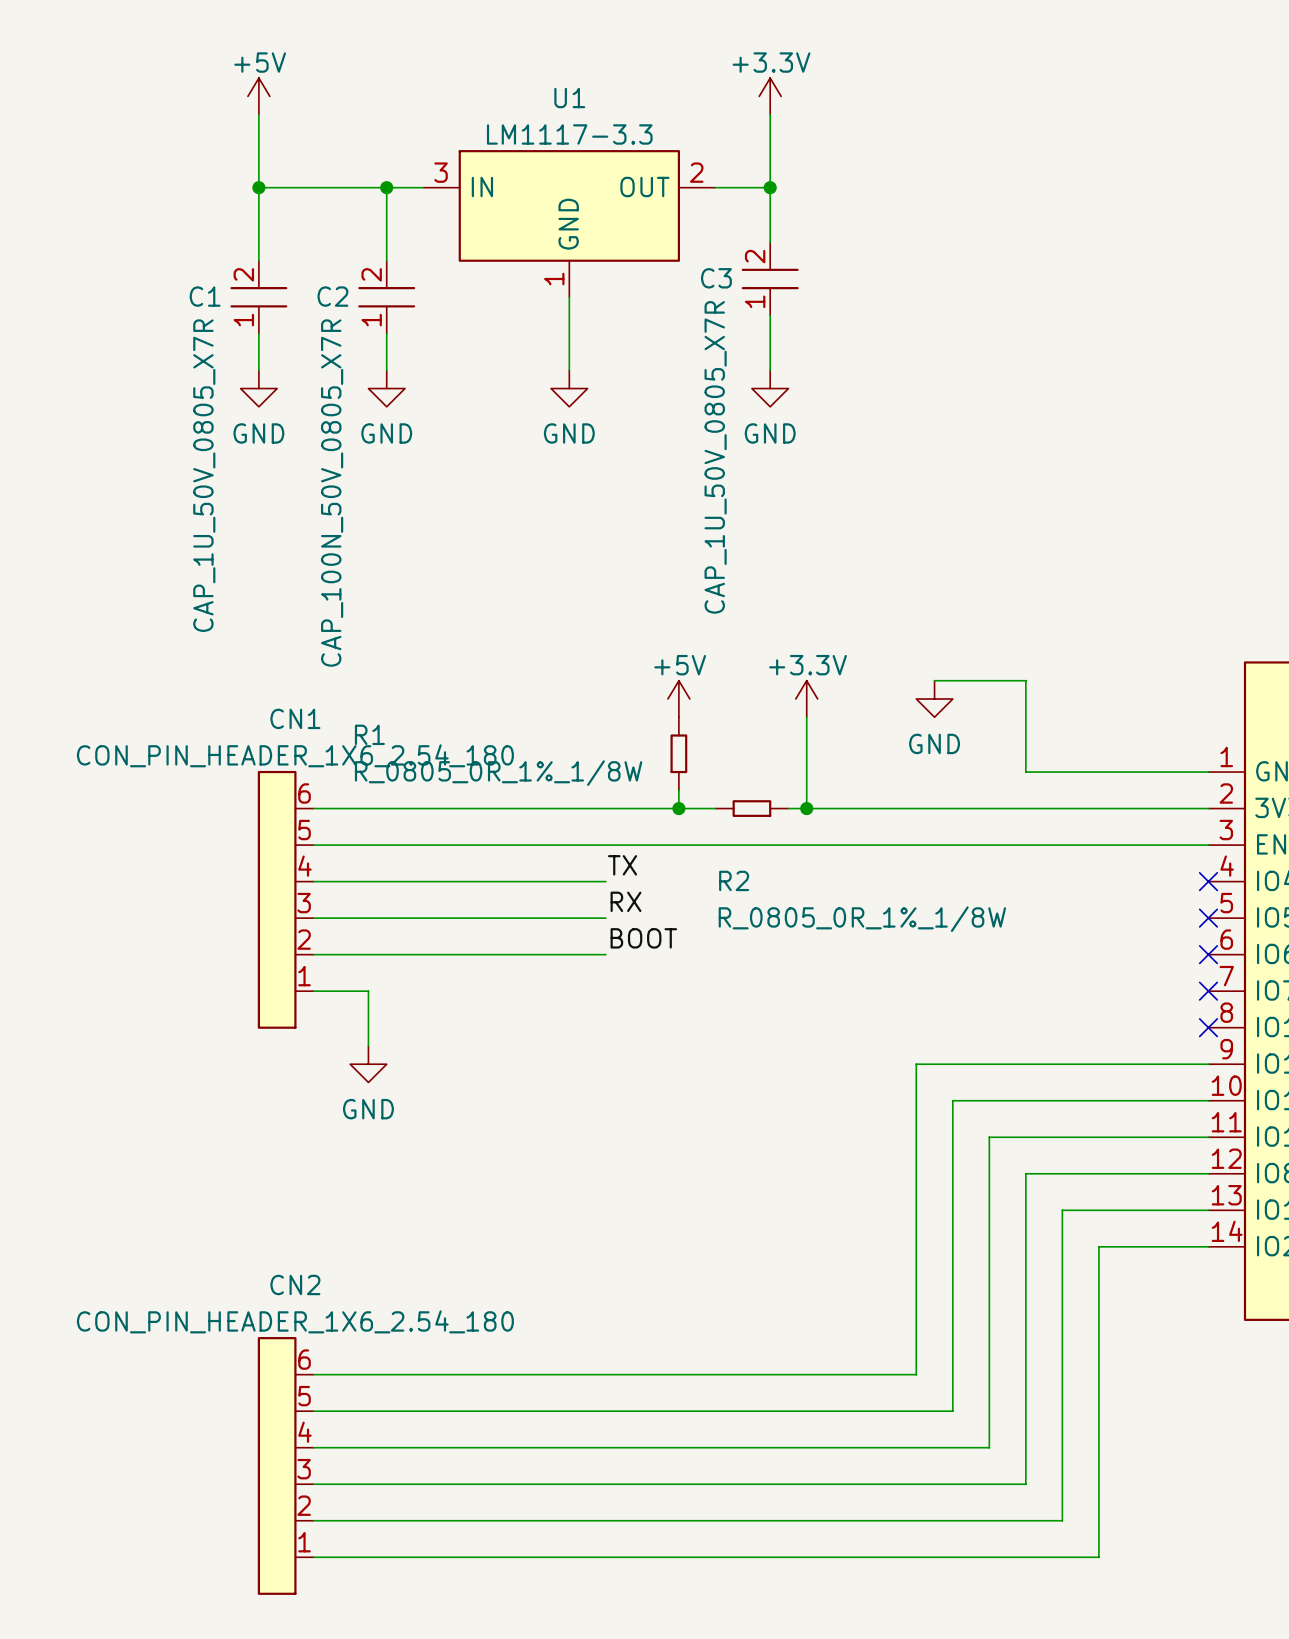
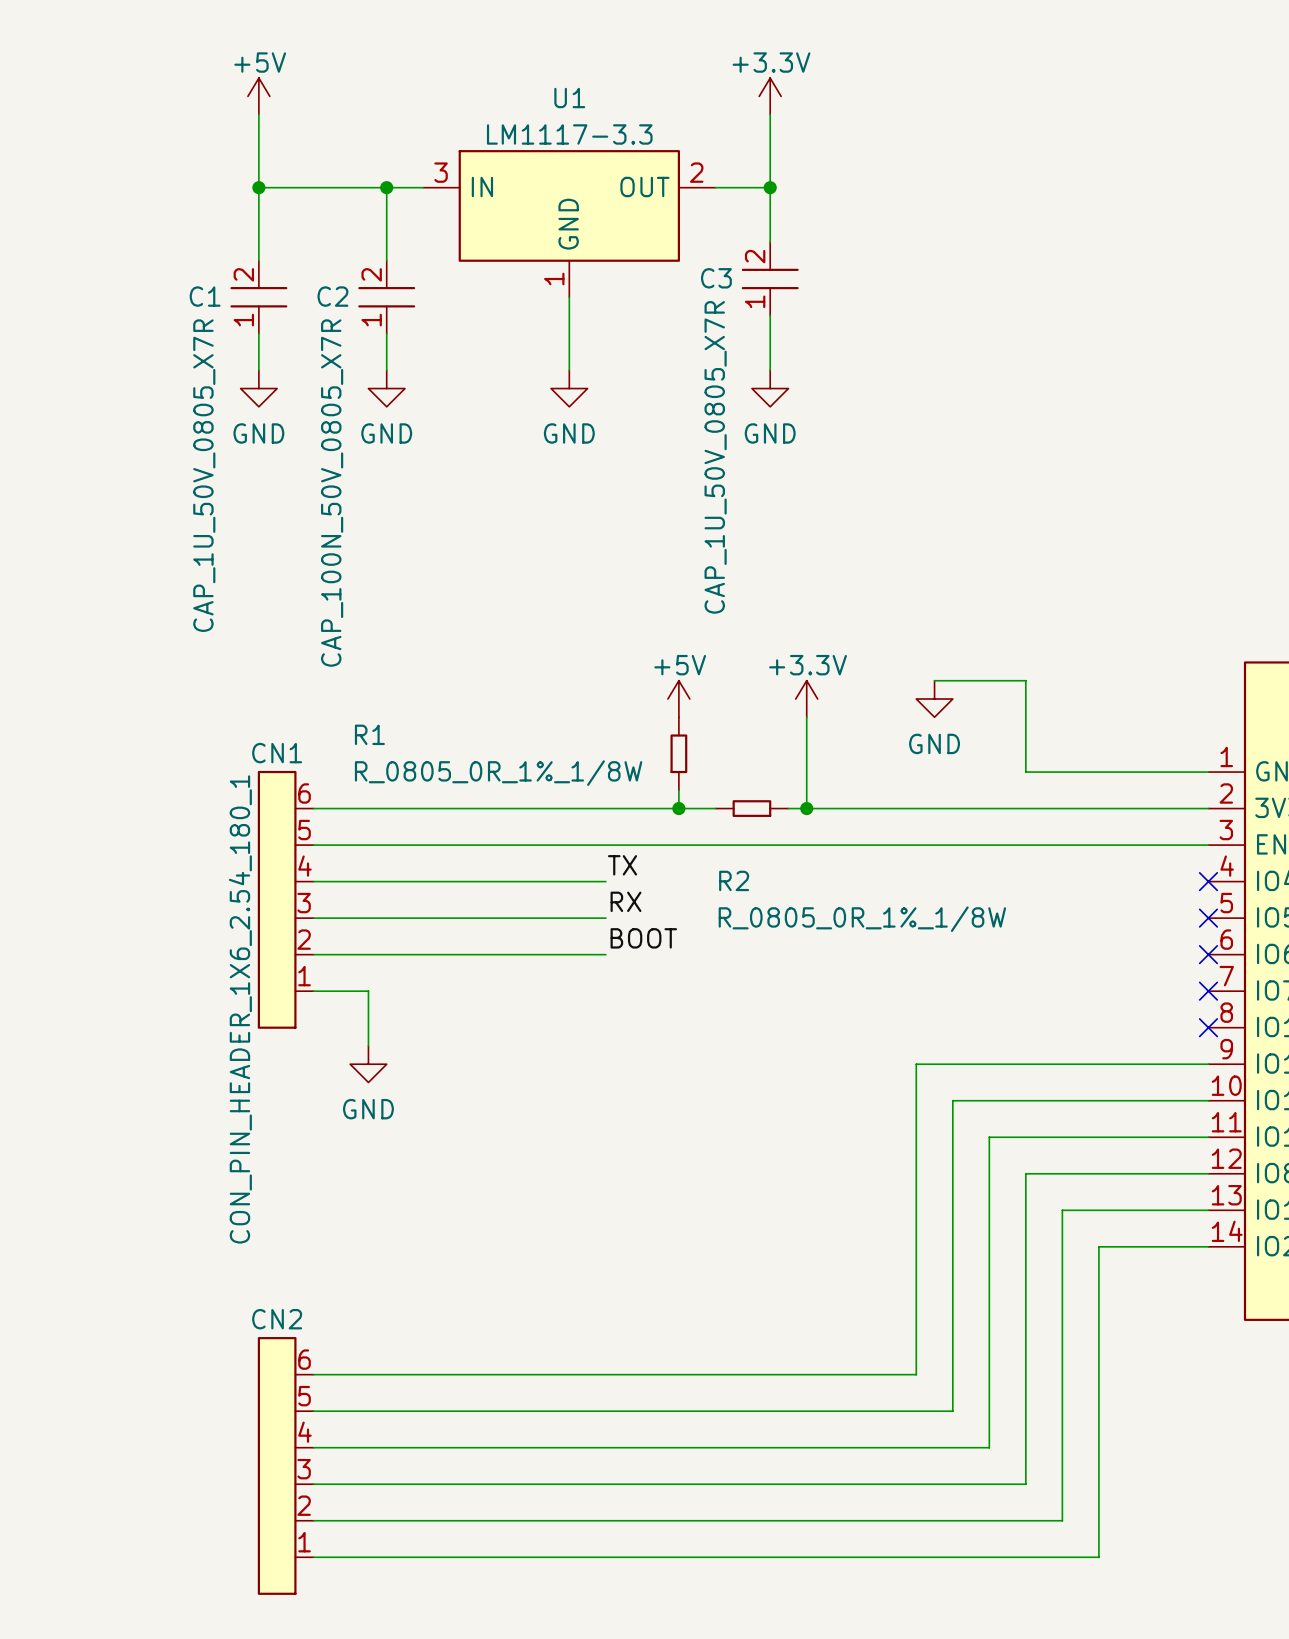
CN1 name position: CN1 (295, 718) -> CN1 (277, 753)
CN1 value: CON_PIN_HEADER_1X6_2.54_180 (295, 755) -> CON_PIN_HEADER_1X6_2.54_180_1 (240, 1009)
CN2 name position: CN2 (295, 1284) -> CN2 (277, 1319)
CN2 value: CON_PIN_HEADER_1X6_2.54_180 (295, 1321) -> none

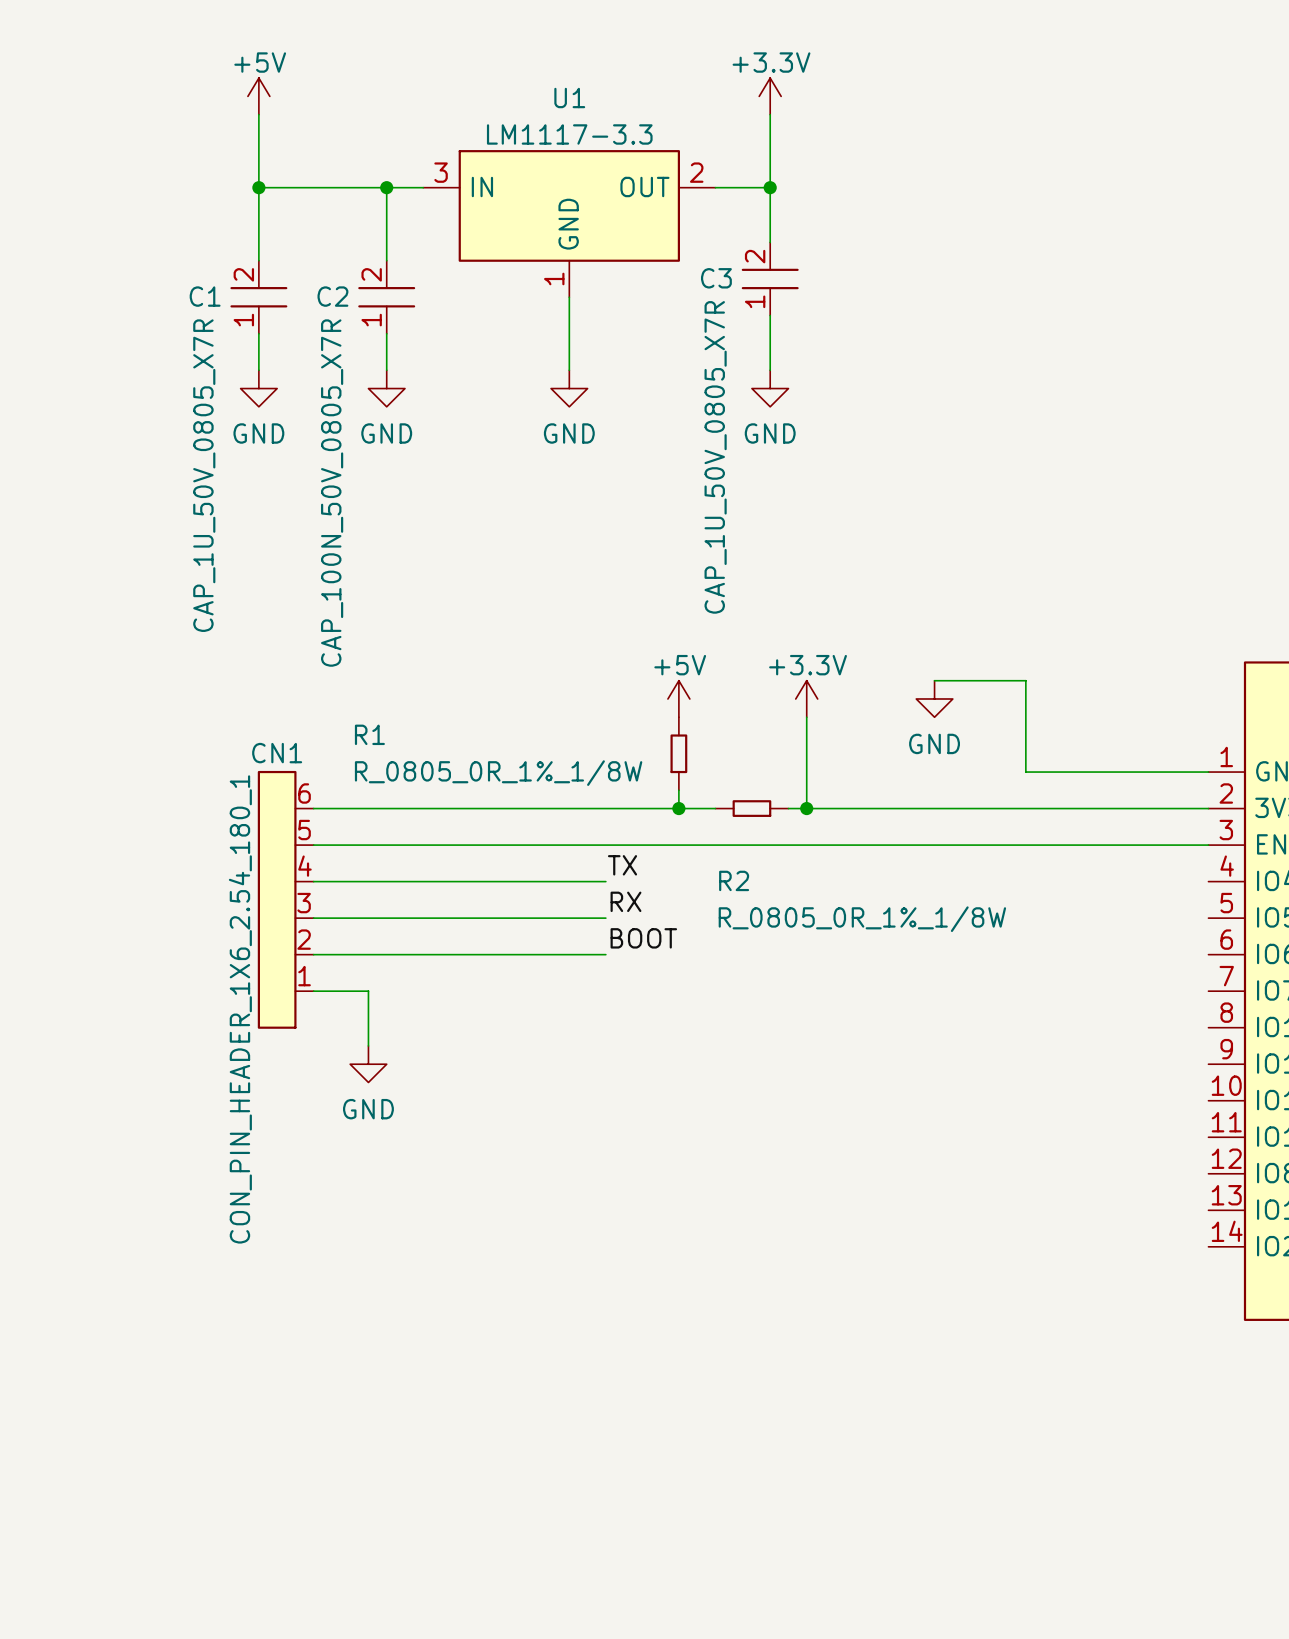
no-connect mark: (1208, 881) -> none
no-connect mark: (1208, 918) -> none
no-connect mark: (1208, 954) -> none
no-connect mark: (1208, 991) -> none
no-connect mark: (1208, 1027) -> none
wire: (1208, 1064) (916, 1064) (916, 1374) (313, 1374) -> none
wire: (1208, 1100) (952, 1100) (952, 1411) (313, 1411) -> none
wire: (1208, 1137) (989, 1137) (989, 1447) (313, 1447) -> none
wire: (1208, 1173) (1025, 1173) (1025, 1484) (313, 1484) -> none
wire: (1208, 1210) (1062, 1210) (1062, 1520) (313, 1520) -> none
wire: (1208, 1246) (1098, 1246) (1098, 1557) (313, 1557) -> none
CN2: (285, 1465) -> none

